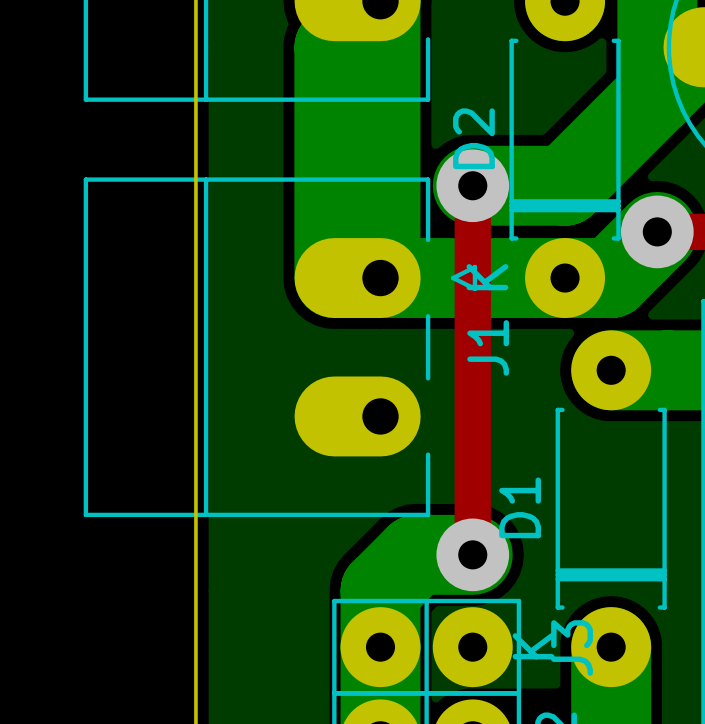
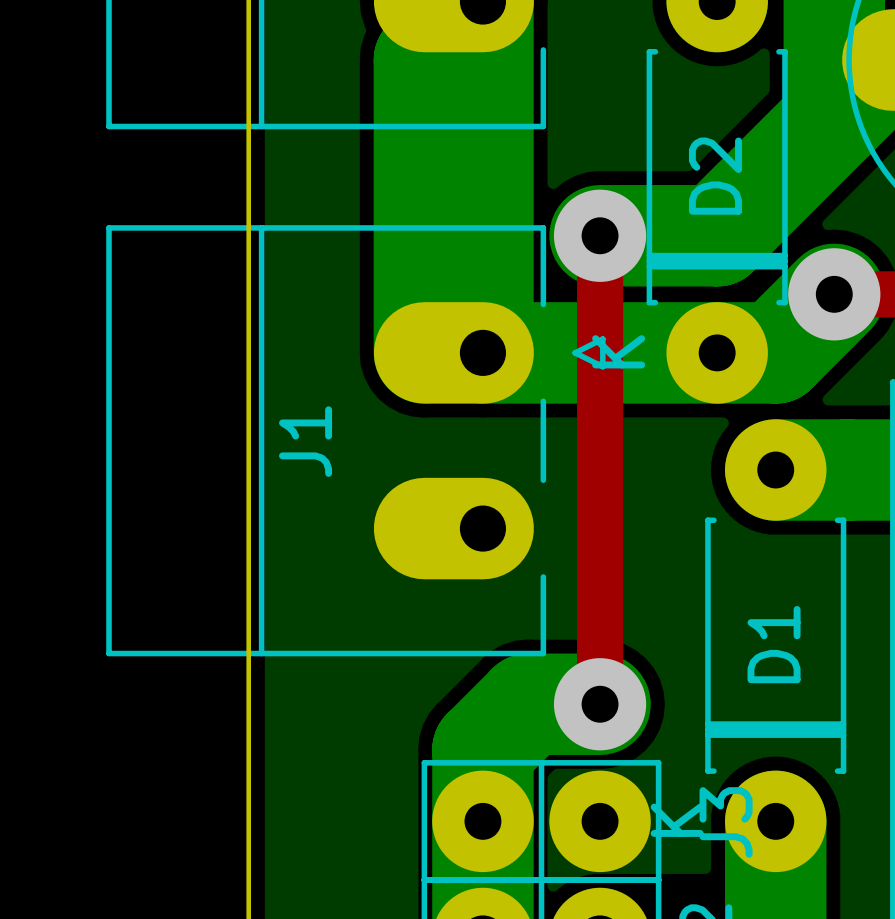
D2 name position: D2 (473, 138) -> D2 (715, 176)
J1 name position: J1 (488, 347) -> J1 (305, 441)
D1 name position: D1 (520, 507) -> D1 (774, 644)

